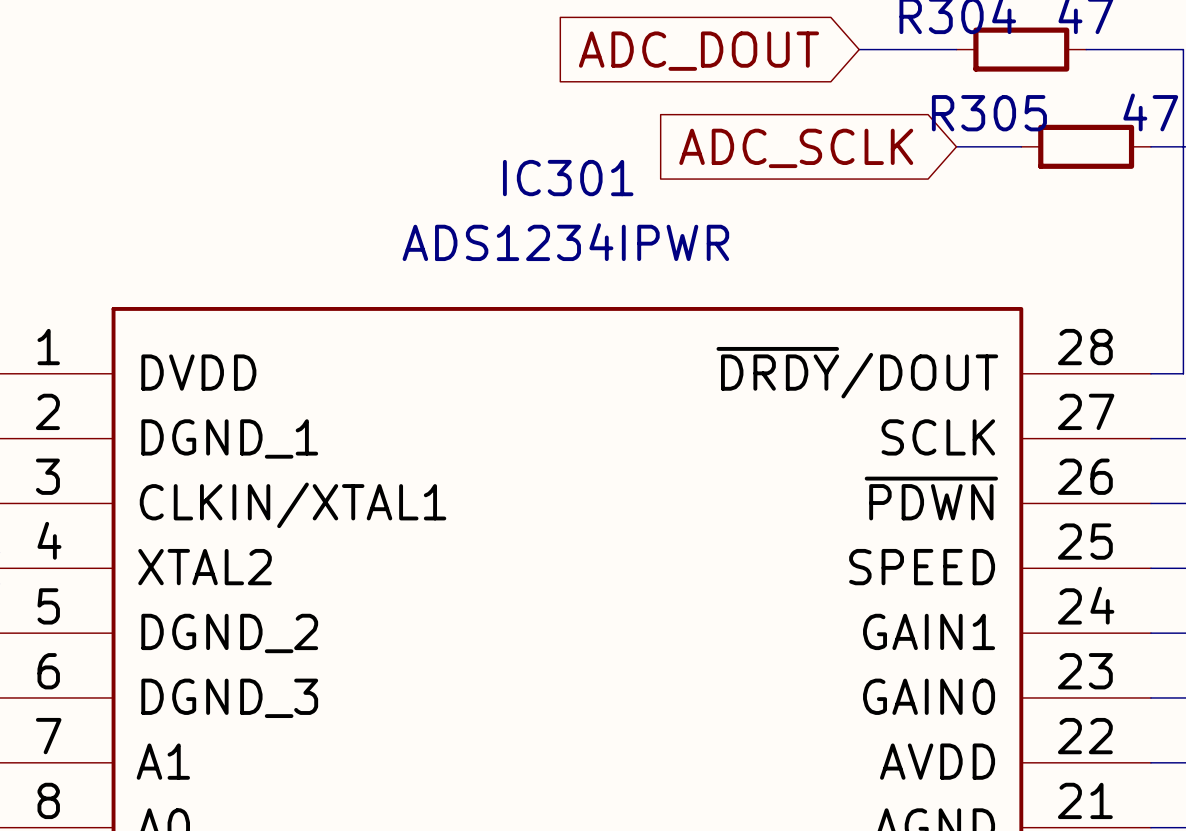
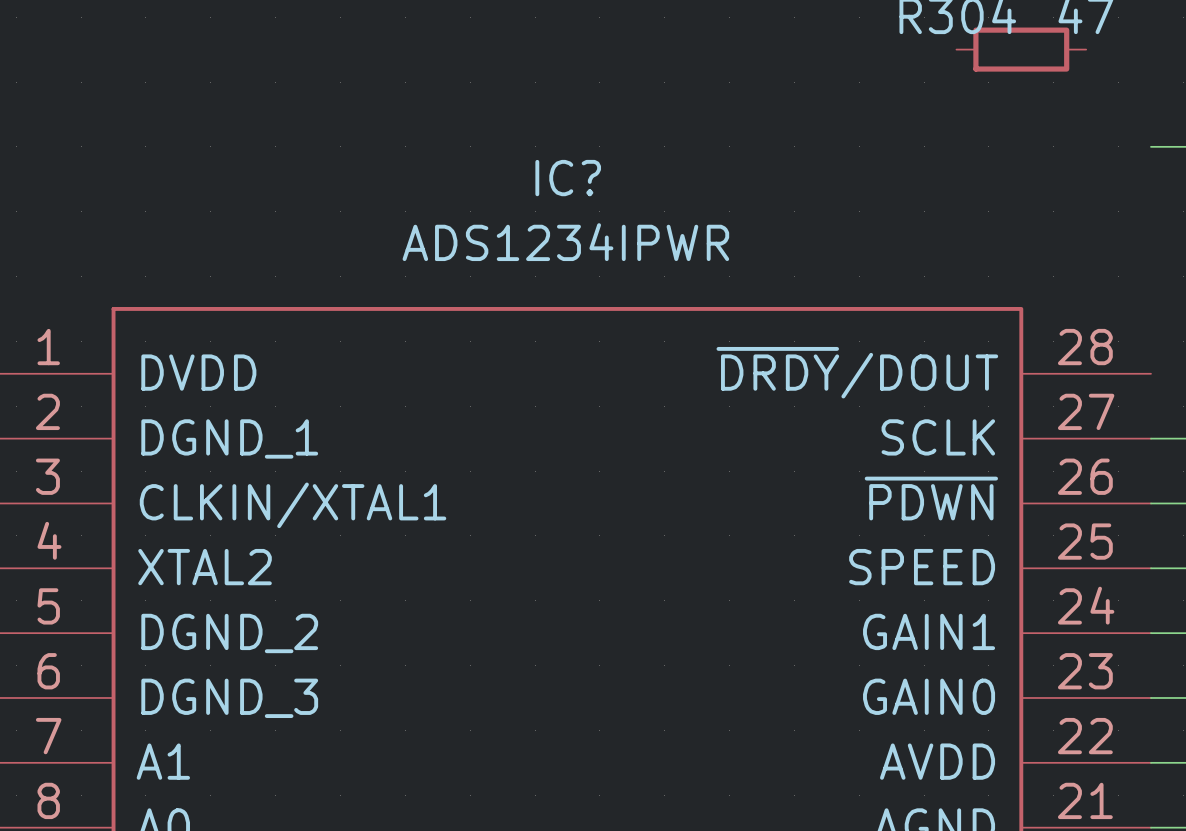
wire: (859, 49) (956, 49) -> none
wire: (1086, 49) (1183, 49) (1183, 373) (1150, 373) -> none
global label: ADC_DOUT (698, 51) -> none
wire: (956, 146) (1021, 146) -> none
R305: 47 (1086, 146) -> none
global label: ADC_SCLK (796, 148) -> none
IC301 name: IC301 (568, 178) -> IC? (568, 178)

